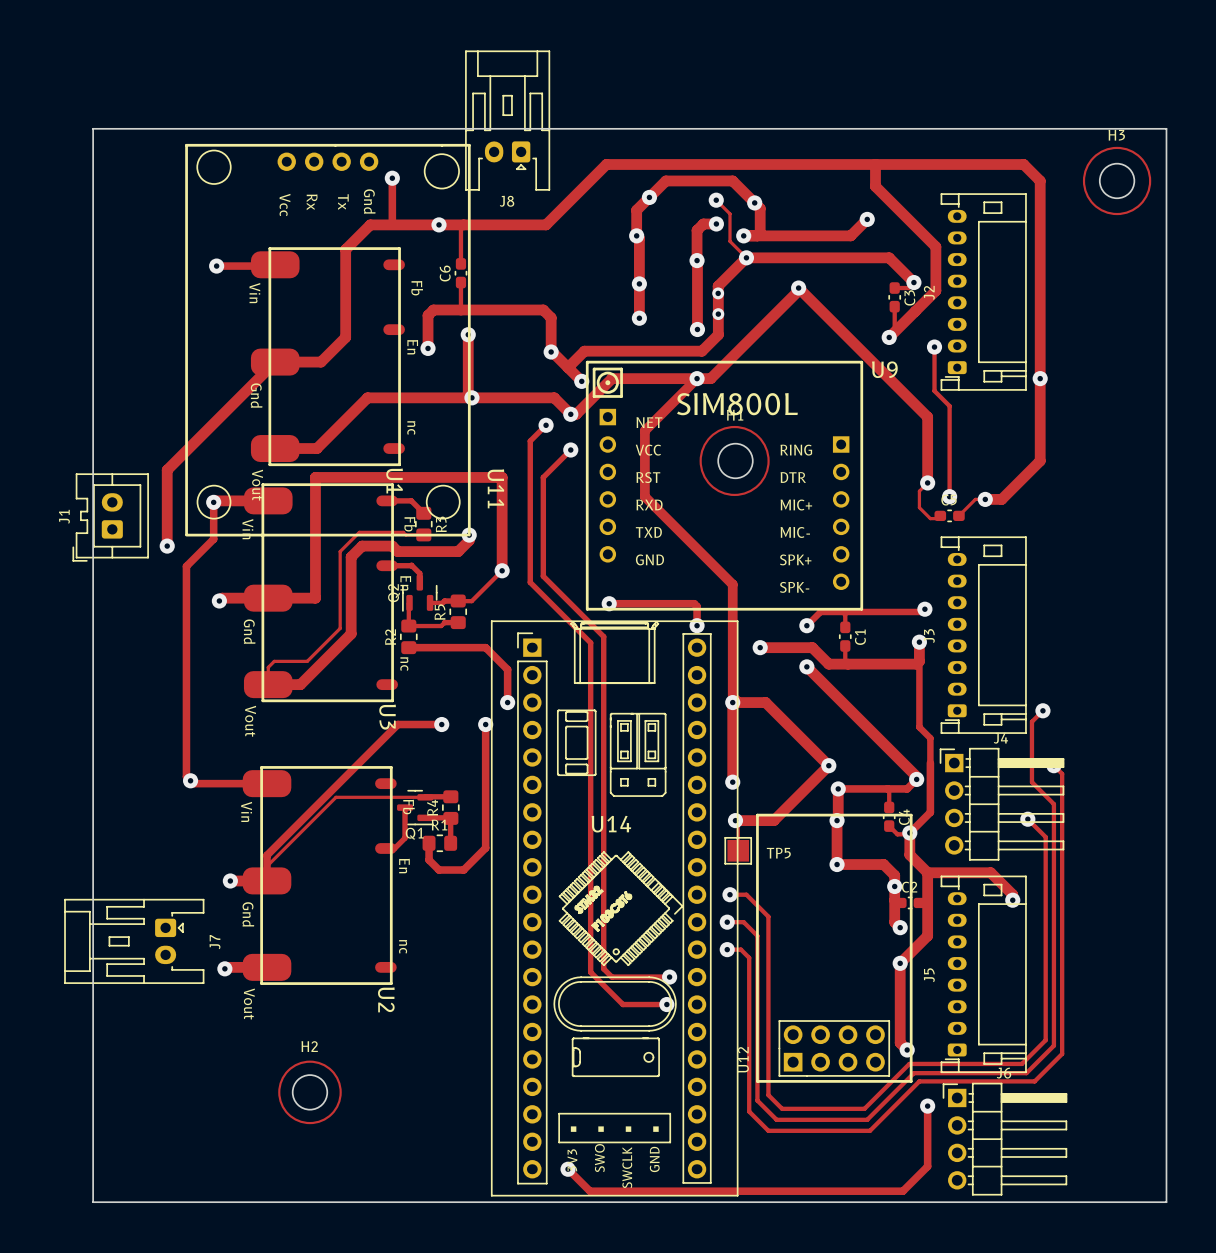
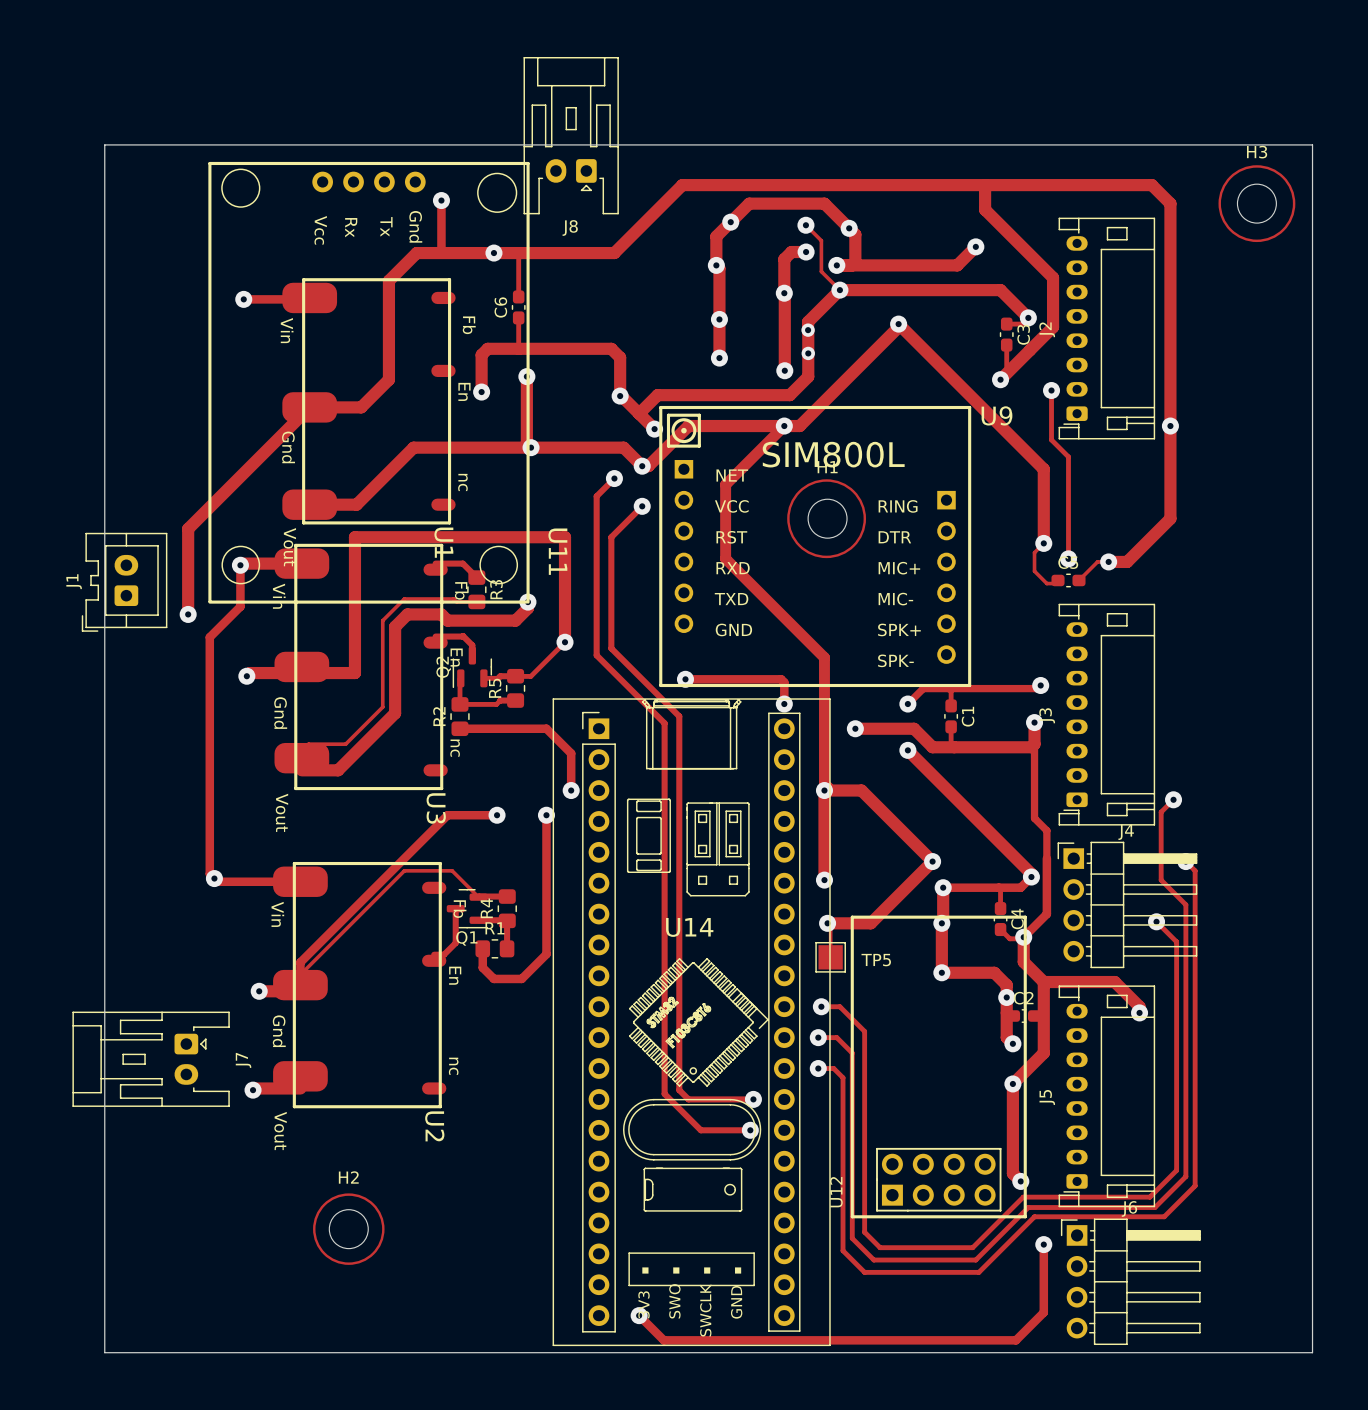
U3 footprint: [243, 483, 398, 703] -> [274, 543, 448, 791]
U2 footprint: [242, 766, 397, 985] -> [273, 861, 447, 1109]
track: (336, 797) (425, 797) -> (378, 897) (404, 870) (452, 870) (478, 897)

